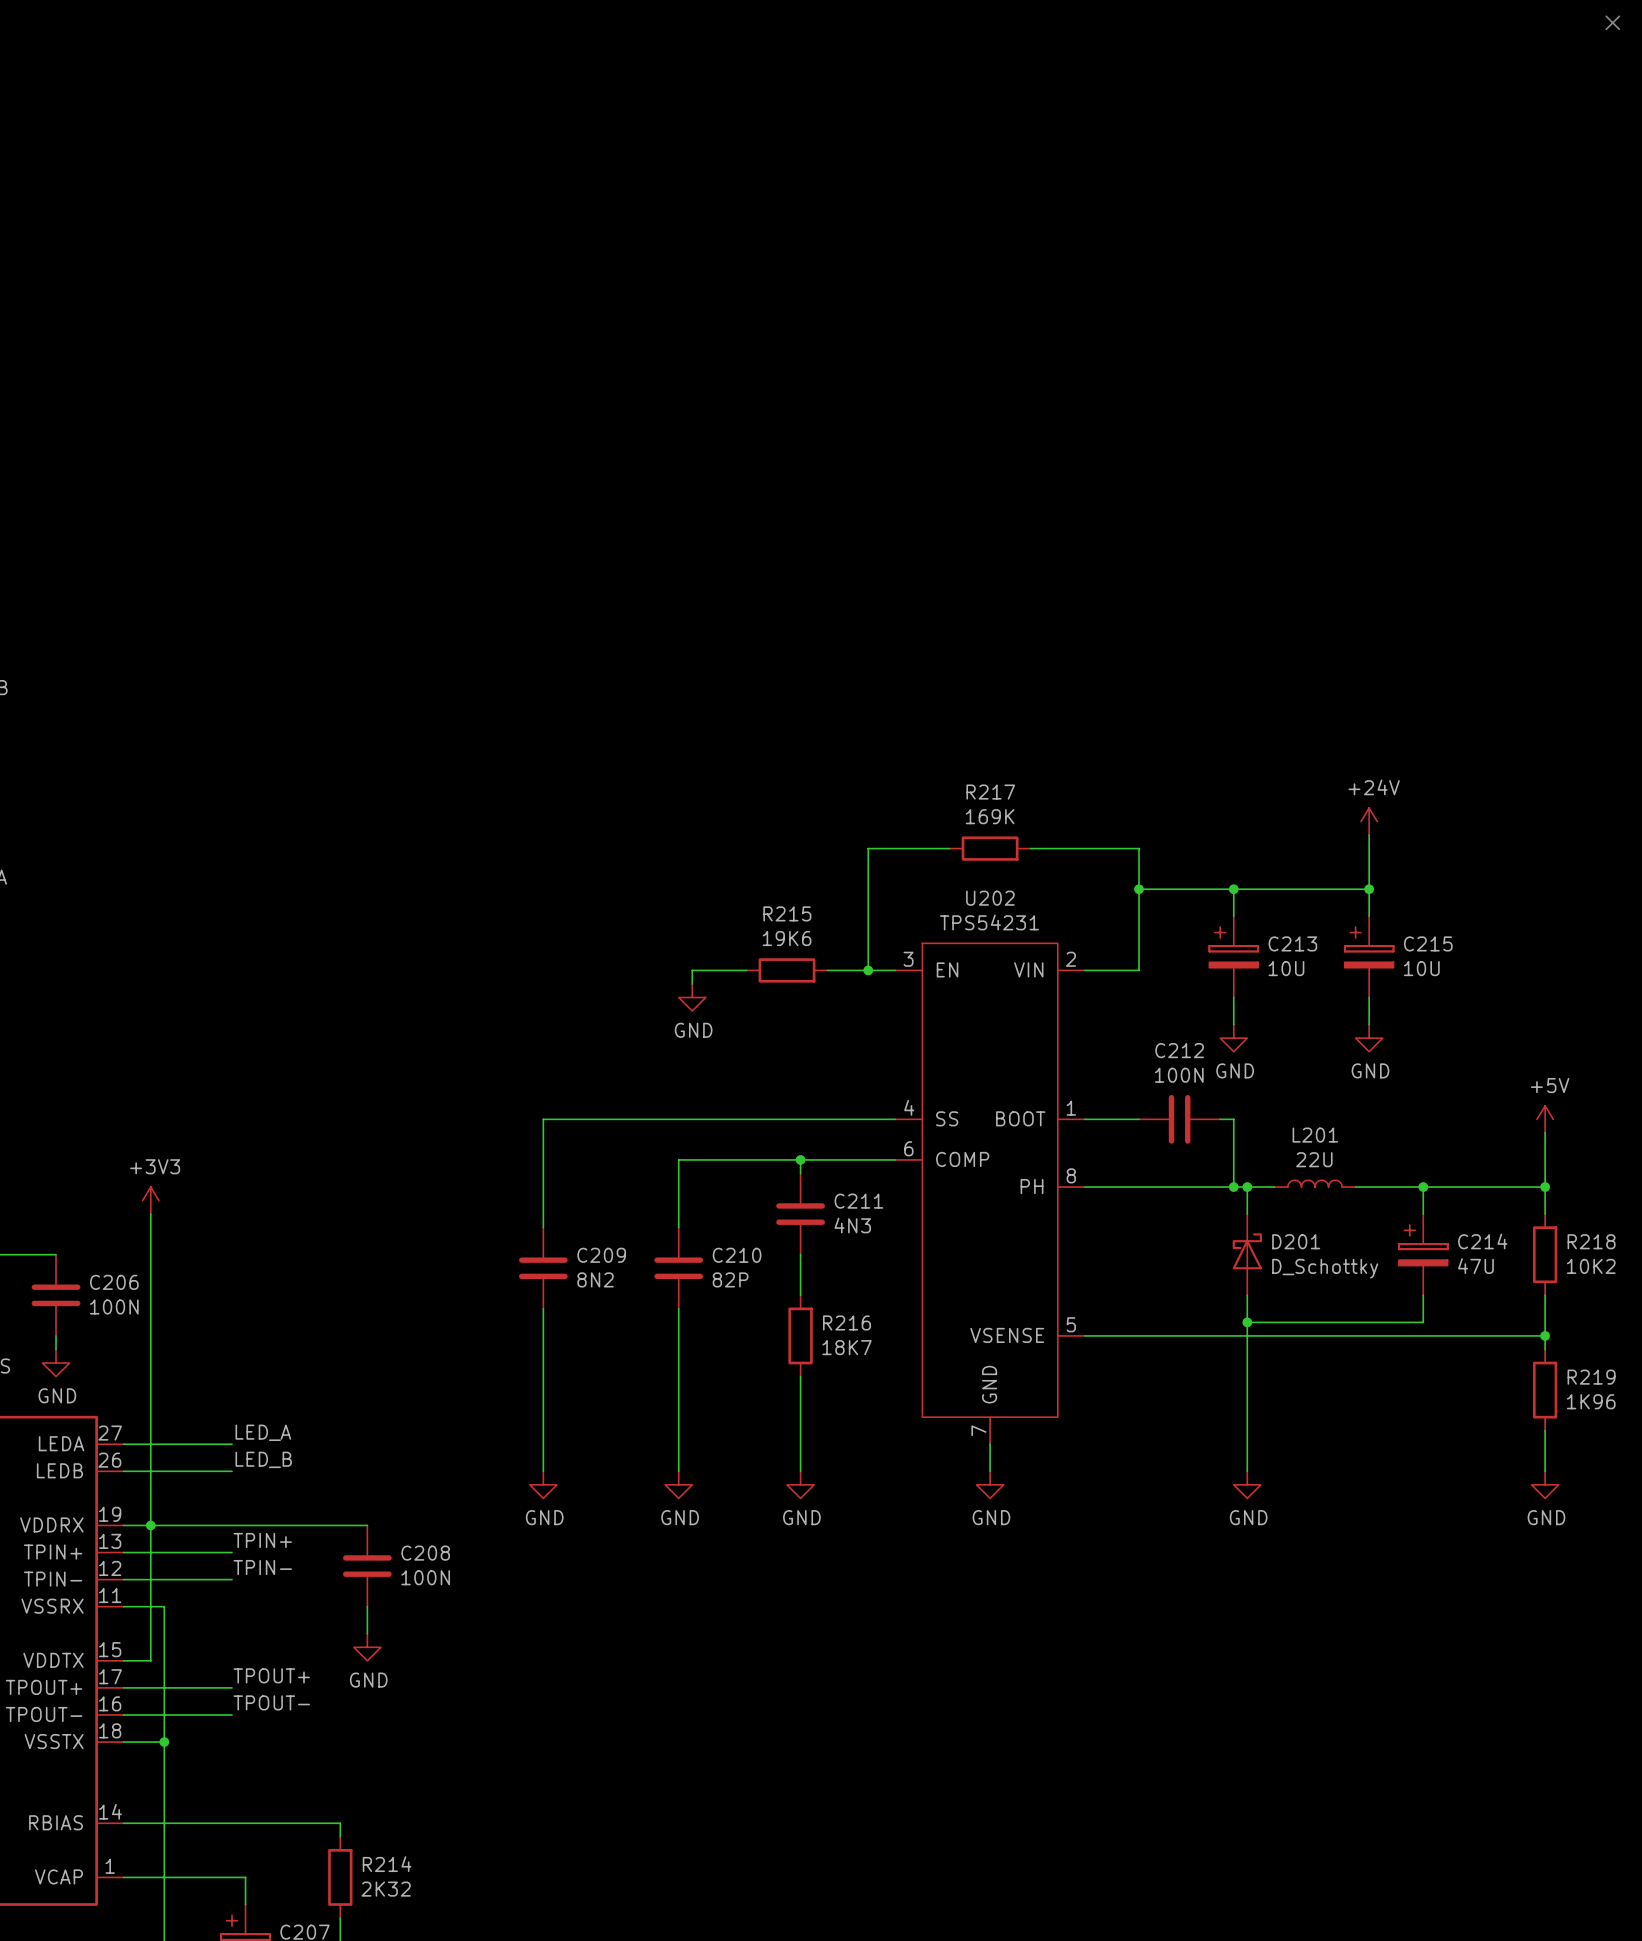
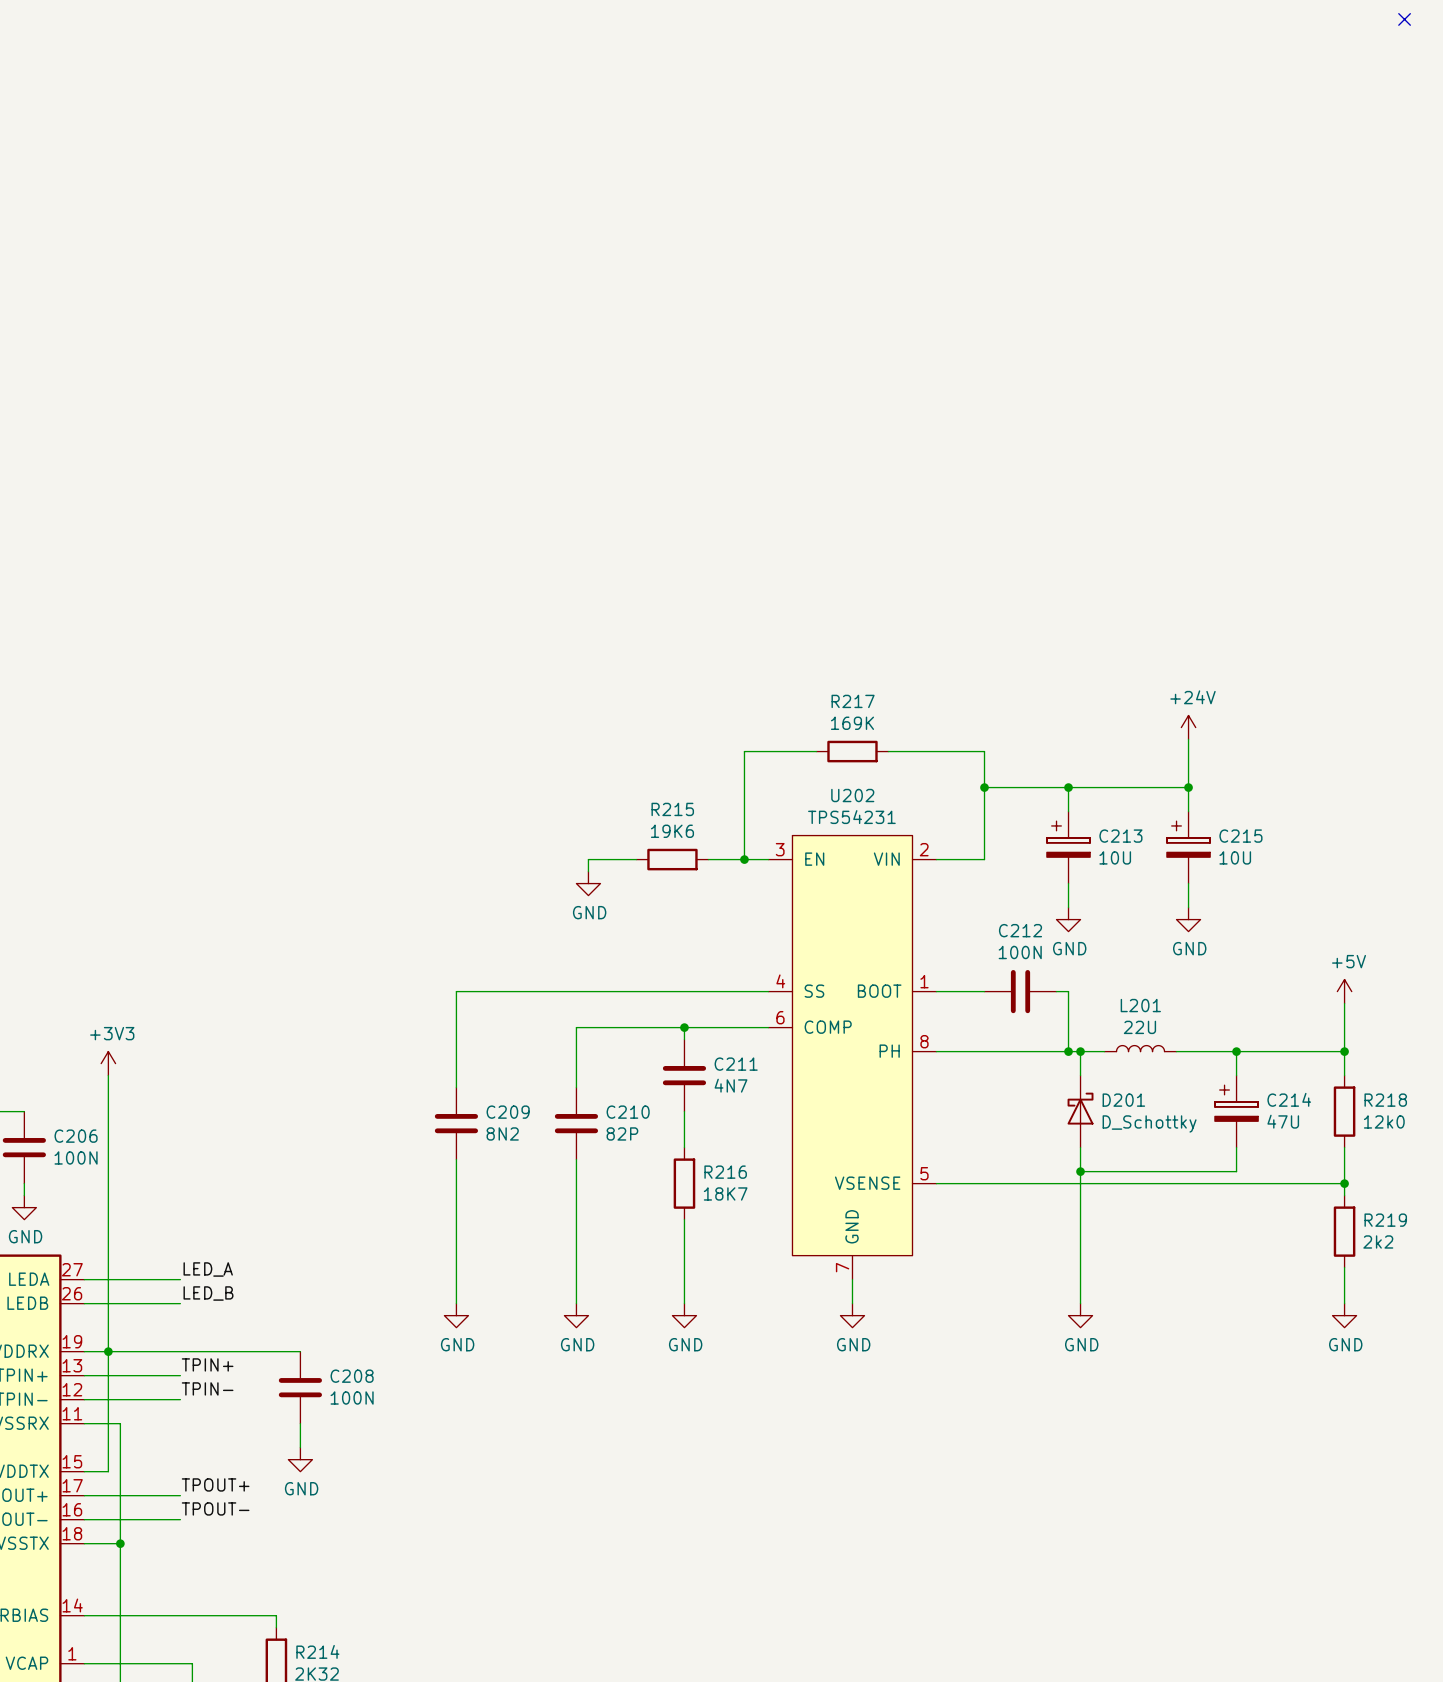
C211 value: 4N3 (852, 1225) -> 4N7 (731, 1085)
R218 value: 10K2 (1591, 1266) -> 12k0 (1384, 1121)
R219 value: 1K96 (1591, 1401) -> 2k2 (1378, 1241)

